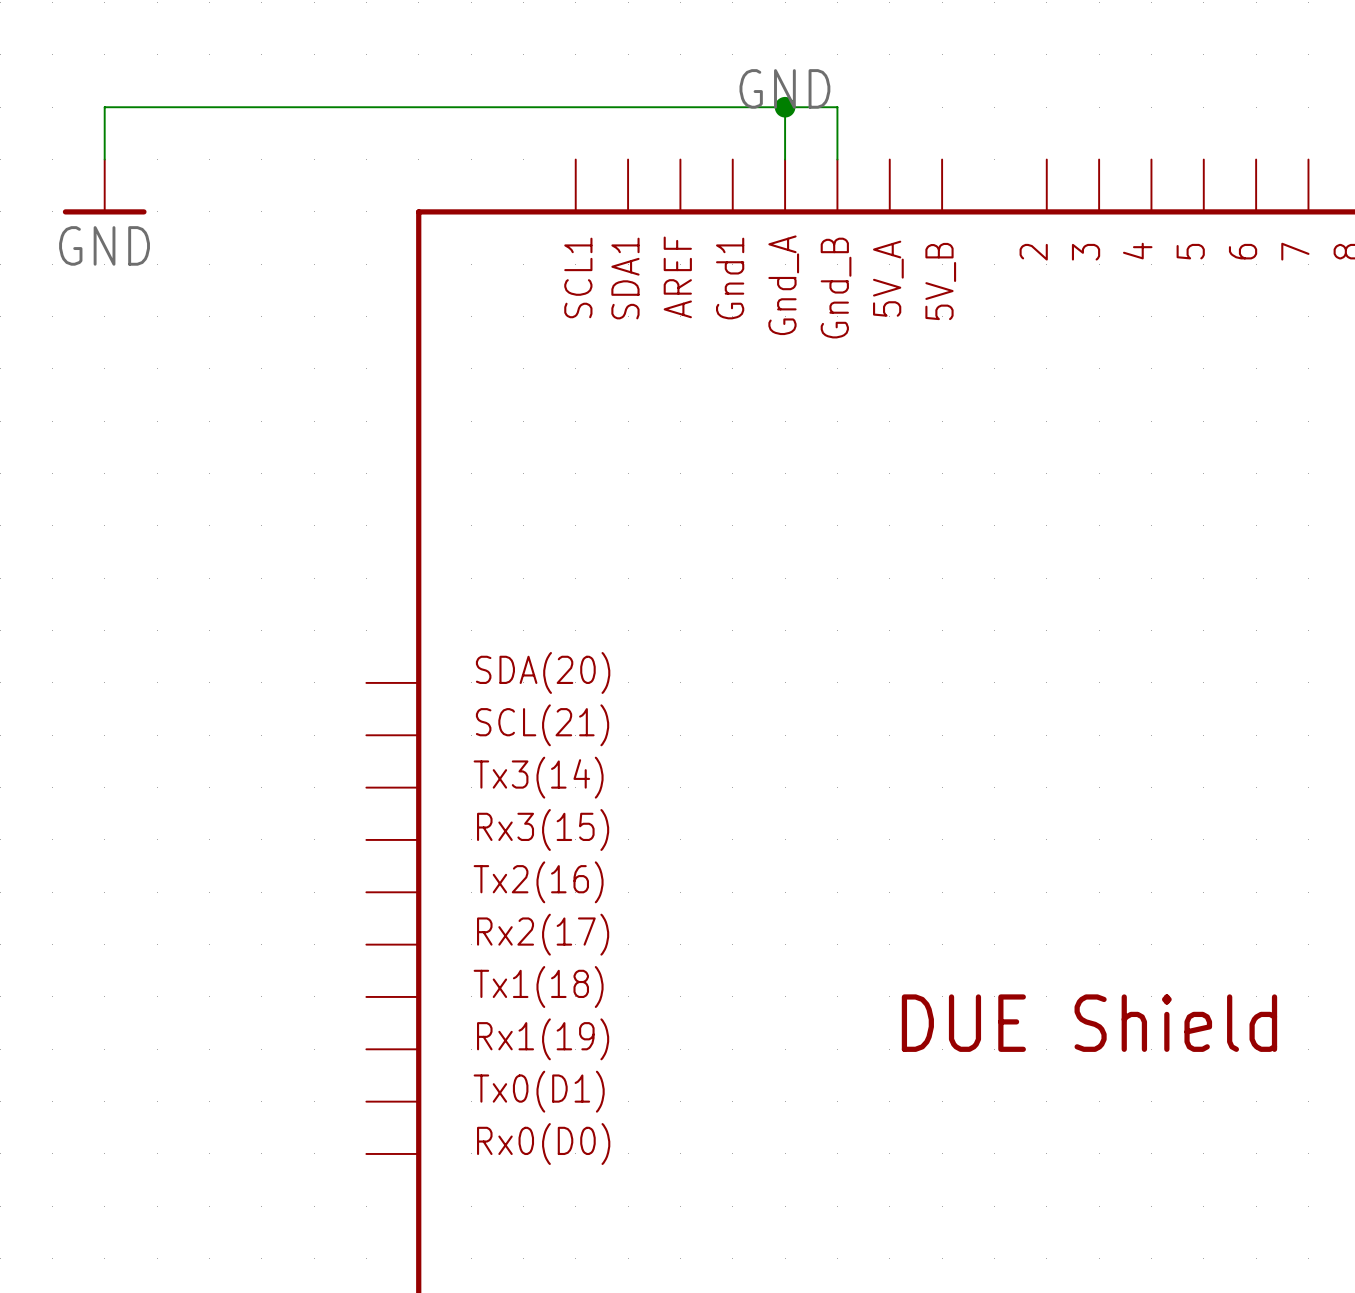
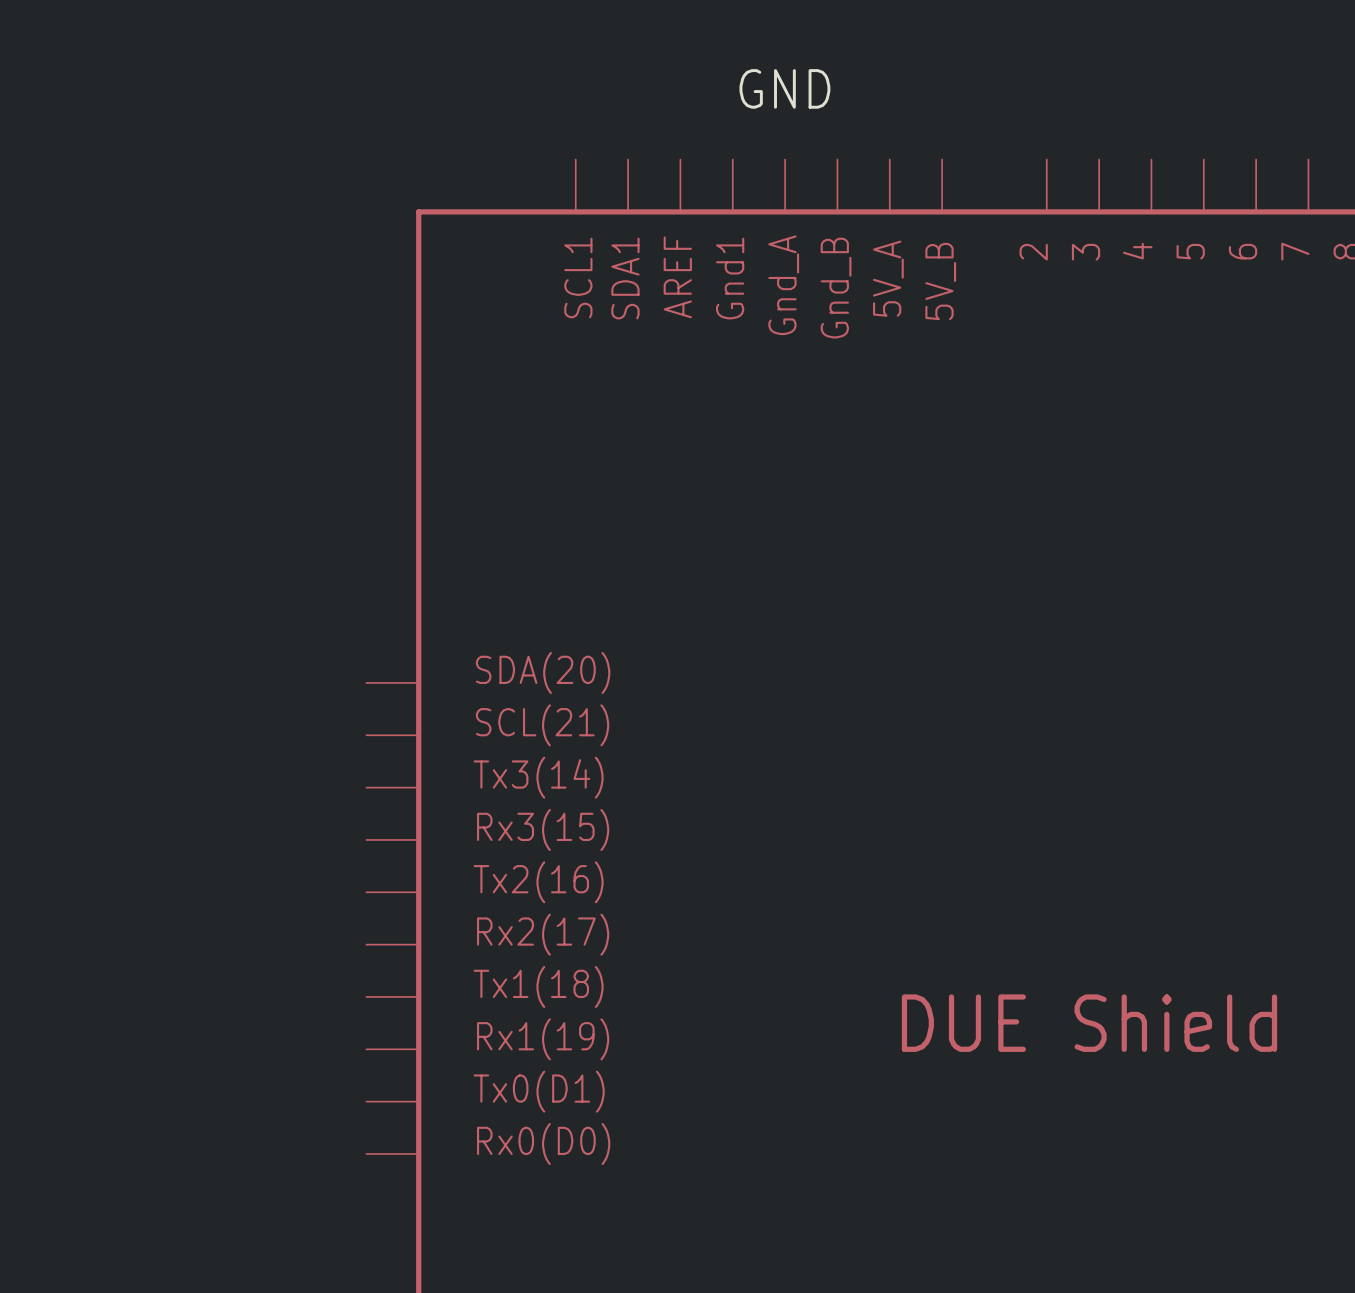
wire: (785, 107) (785, 159) -> none
junction: (785, 107) -> none
wire: (104, 159) (104, 107) (837, 107) (837, 159) -> none
power symbol: GND (104, 187) -> none

